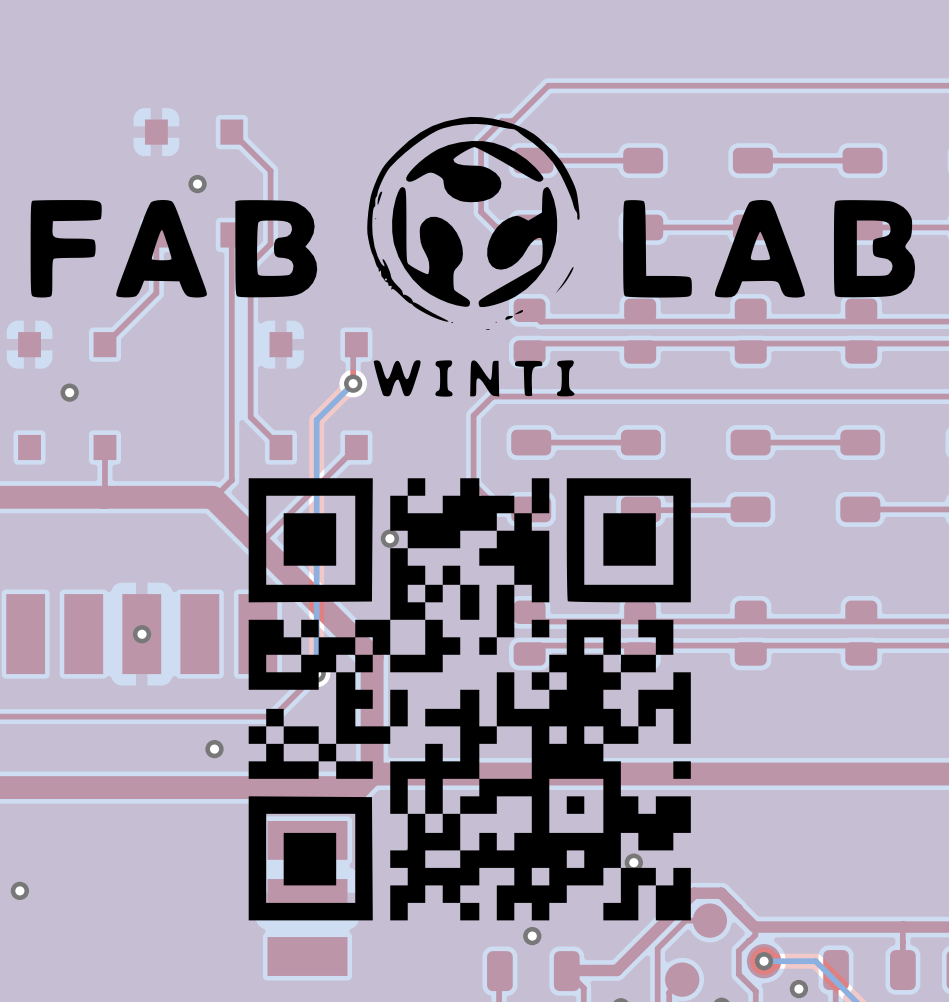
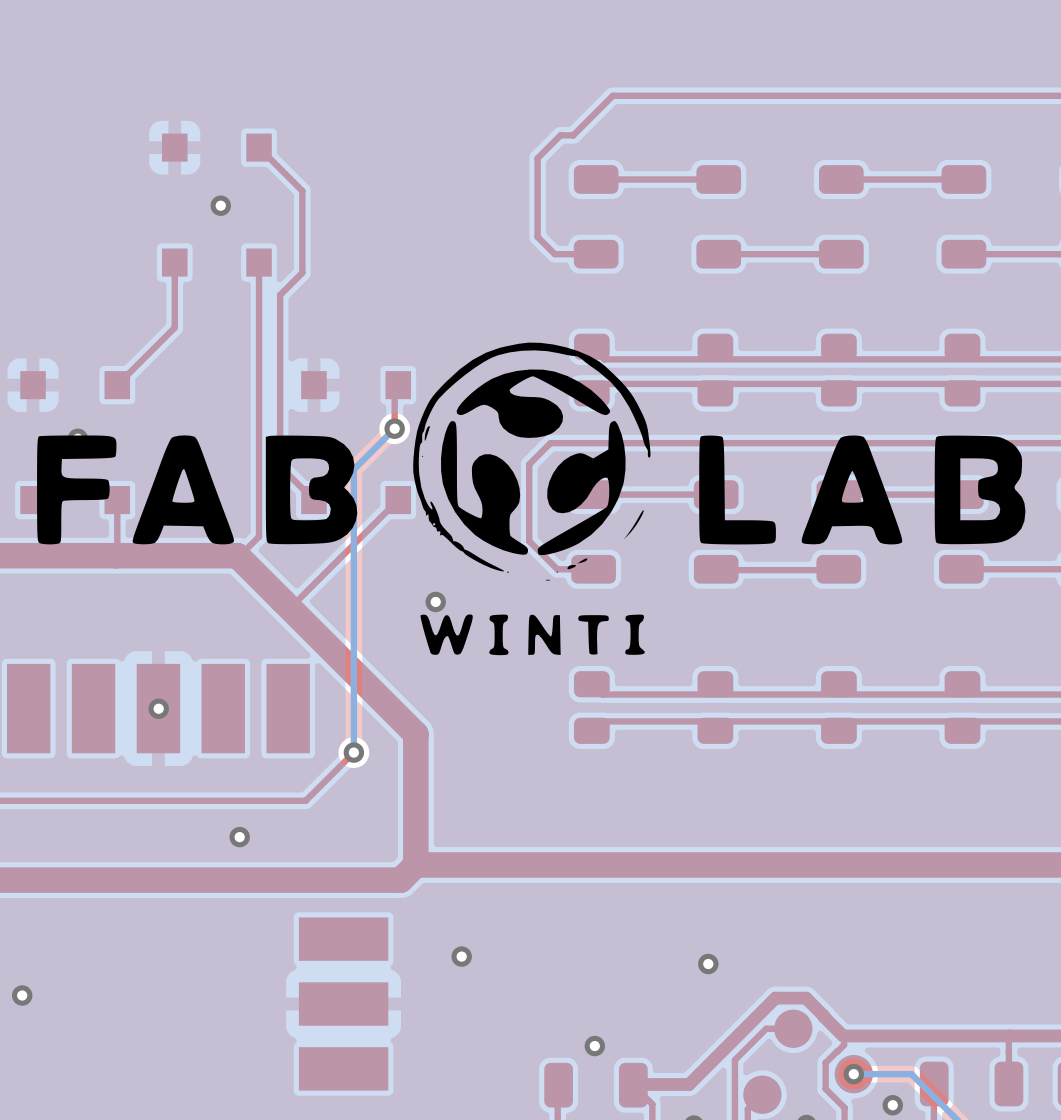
drawing position: (472, 256) -> (531, 498)
drawing: [248, 478, 691, 921] -> none

